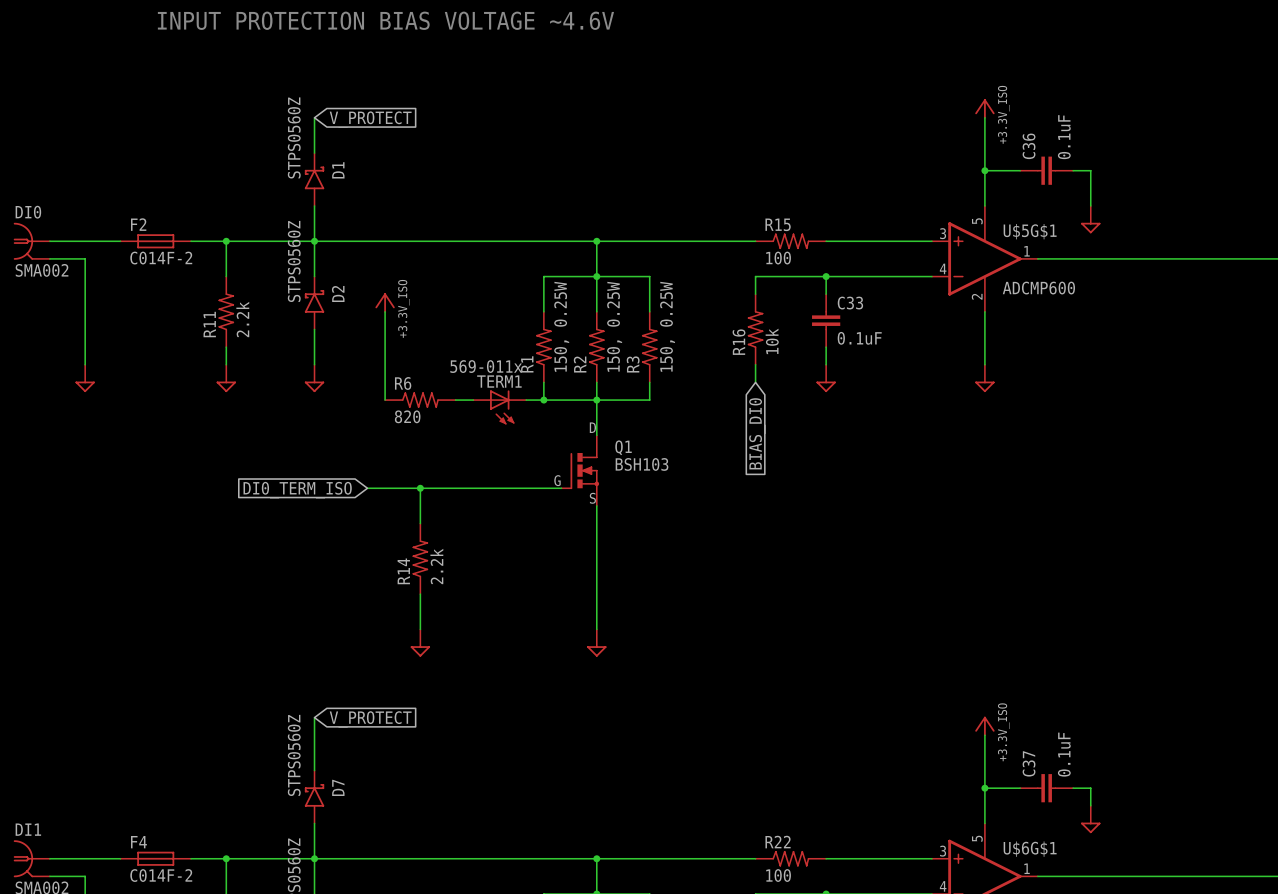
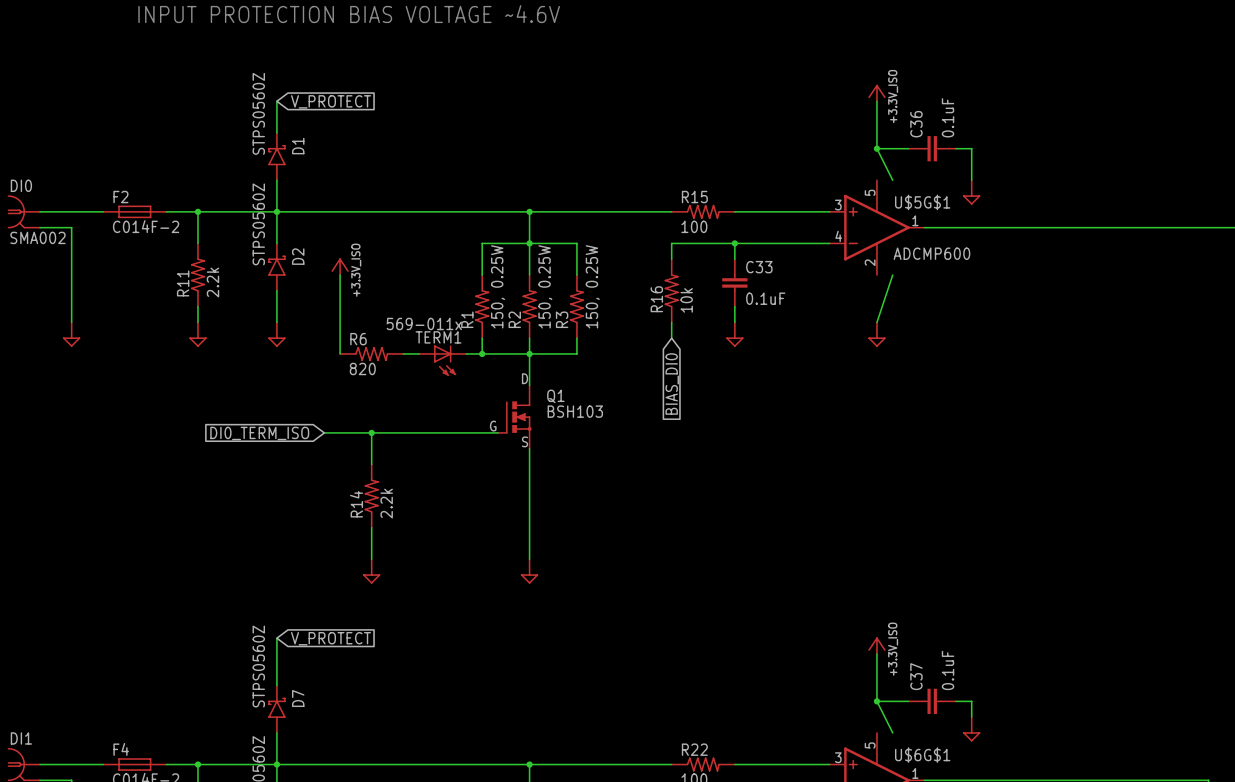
wire: (984, 170) (984, 206) -> (876, 148) (892, 180)
wire: (984, 311) (984, 364) -> (892, 275) (876, 322)
wire: (984, 788) (984, 823) -> (876, 701) (892, 732)

